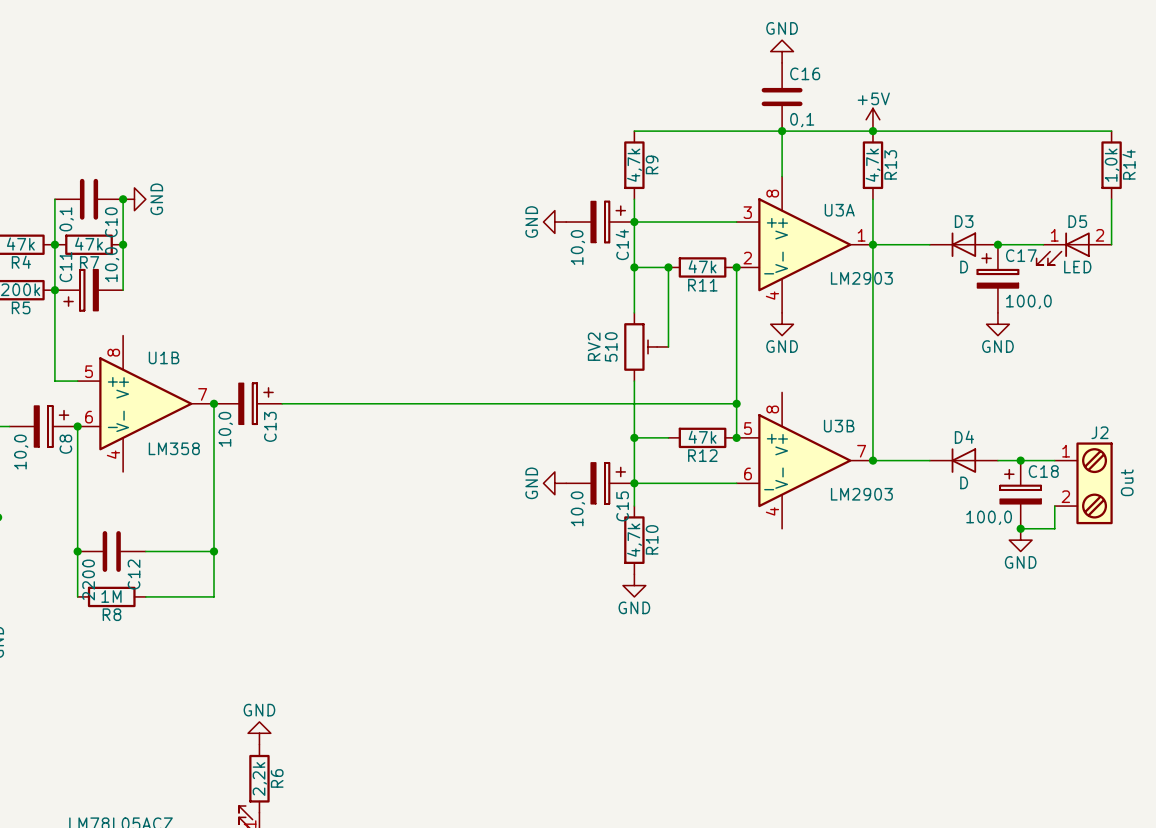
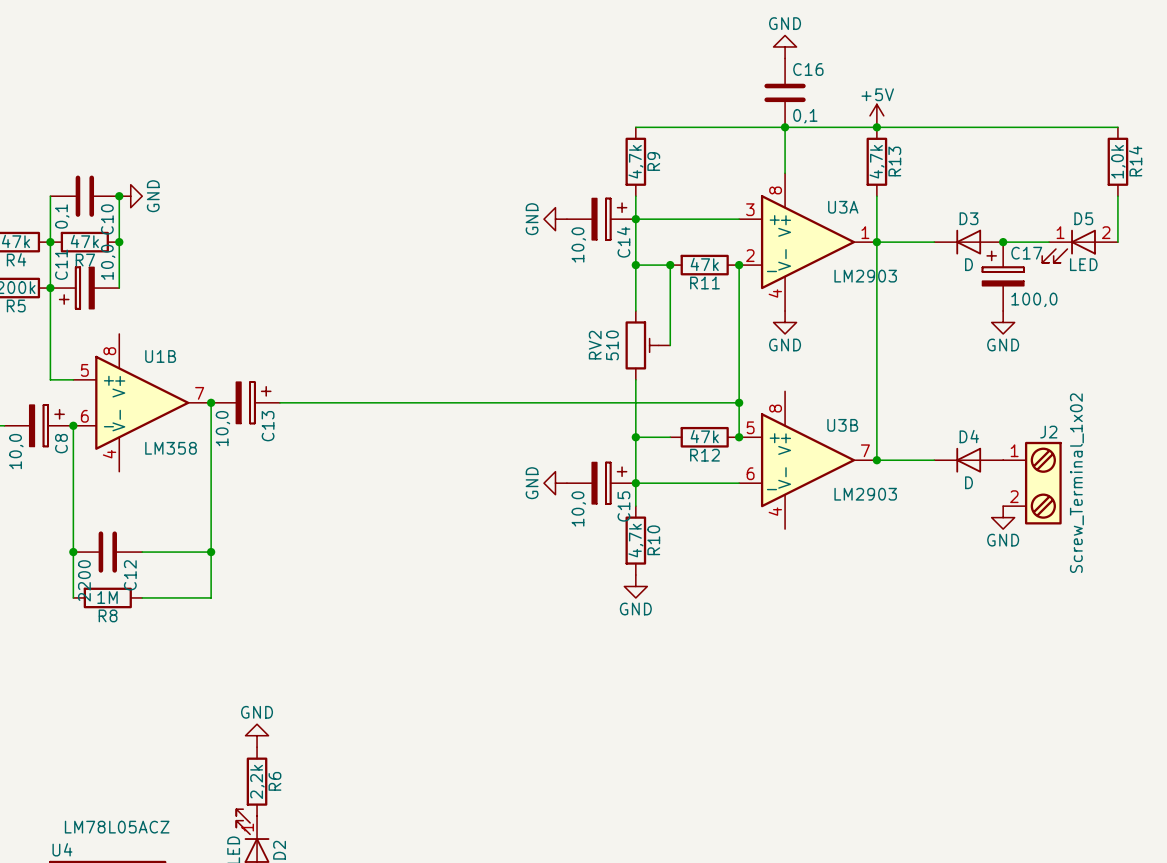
junction: (1020, 460) -> none
J2 value: Out (1127, 482) -> Screw_Terminal_1x02 (1076, 483)
J2 position: (1083, 483) -> (1032, 483)
C18: 100,0 (1020, 494) -> none
wire: (1054, 506) (1054, 528) (1020, 528) -> none
junction: (1020, 528) -> none
power symbol position: GND (1020, 540) -> GND (1003, 517)

